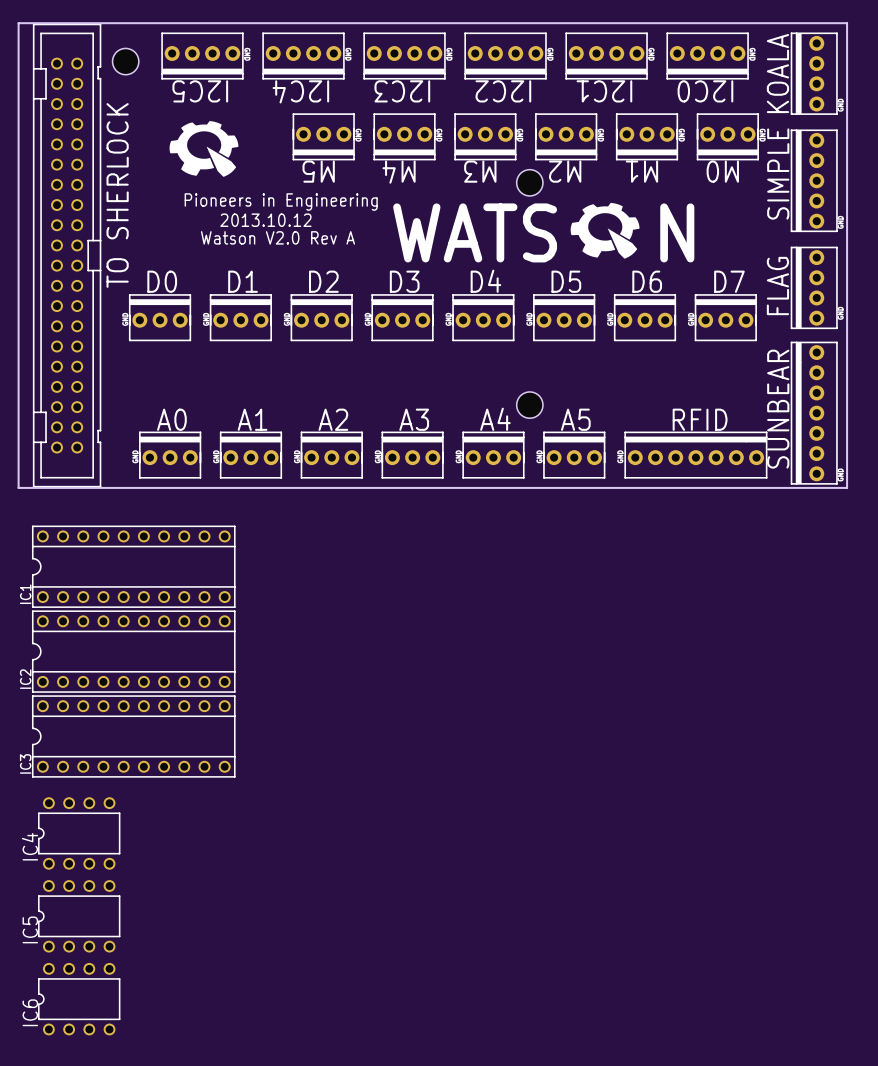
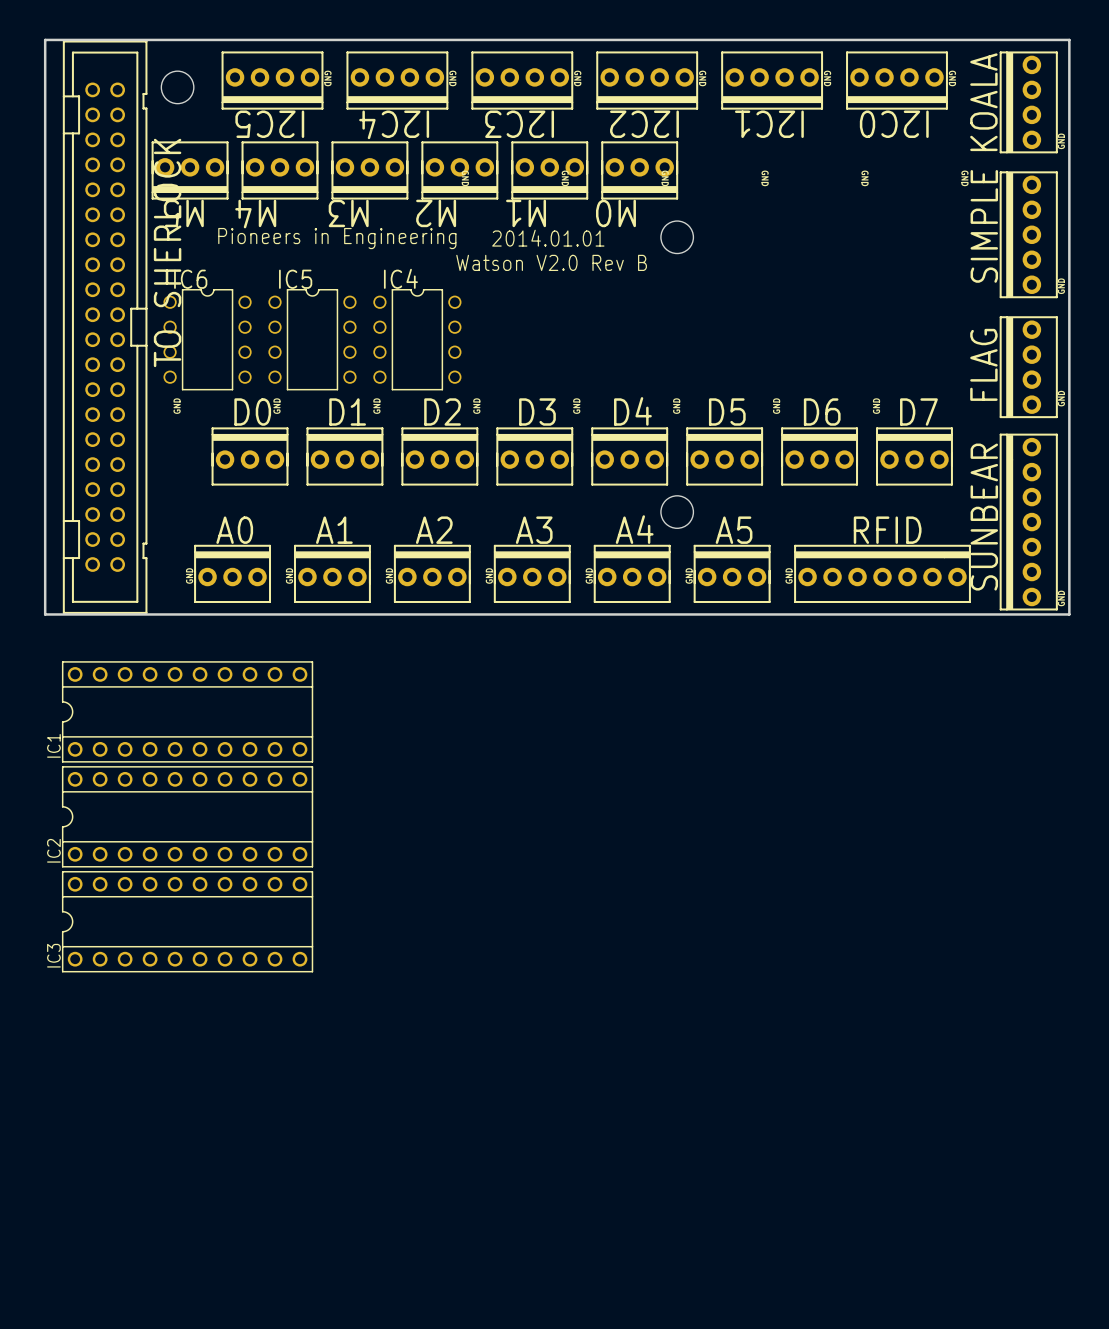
drawing: [169, 121, 239, 177] -> none
M5 position: (323, 136) -> (190, 170)
M4 position: (404, 136) -> (280, 170)
M3 position: (485, 136) -> (369, 170)
M2 position: (566, 136) -> (459, 170)
M1 position: (647, 136) -> (549, 170)
M0 position: (727, 136) -> (639, 170)
M3 name position: M3 (480, 171) -> M3 (348, 213)
M2 name position: M2 (565, 171) -> M2 (436, 213)
M1 name position: M1 (641, 171) -> M1 (526, 213)
M0 name position: M0 (722, 171) -> M0 (615, 213)
M4 name position: M4 (399, 172) -> M4 (255, 214)
text: none -> 2014.01.01 (548, 238)
text position: Pioneers in Engineering (281, 202) -> Pioneers in Engineering (337, 238)
drawing: [570, 202, 640, 259] -> none
text: none -> Watson V2.0 Rev B (551, 262)
text: 2013.10.12 (265, 220) -> none
text: Watson V2.0 Rev A (277, 237) -> none
D0 position: (160, 317) -> (250, 456)
D1 position: (240, 317) -> (344, 456)
D2 position: (321, 317) -> (439, 456)
D3 position: (402, 317) -> (534, 456)
D4 position: (483, 317) -> (629, 456)
D5 position: (564, 317) -> (724, 456)
D6 position: (645, 317) -> (819, 456)
D7 position: (725, 317) -> (914, 456)
IC4 footprint: [38, 797, 121, 870] -> [373, 288, 462, 391]
IC4 name position: IC4 (29, 846) -> IC4 (400, 278)
IC5 footprint: [38, 880, 121, 953] -> [268, 288, 357, 391]
IC5 name position: IC5 (30, 929) -> IC5 (295, 279)
IC6 footprint: [38, 962, 121, 1036] -> [163, 288, 252, 391]
IC6 name position: IC6 (30, 1012) -> IC6 (190, 279)

